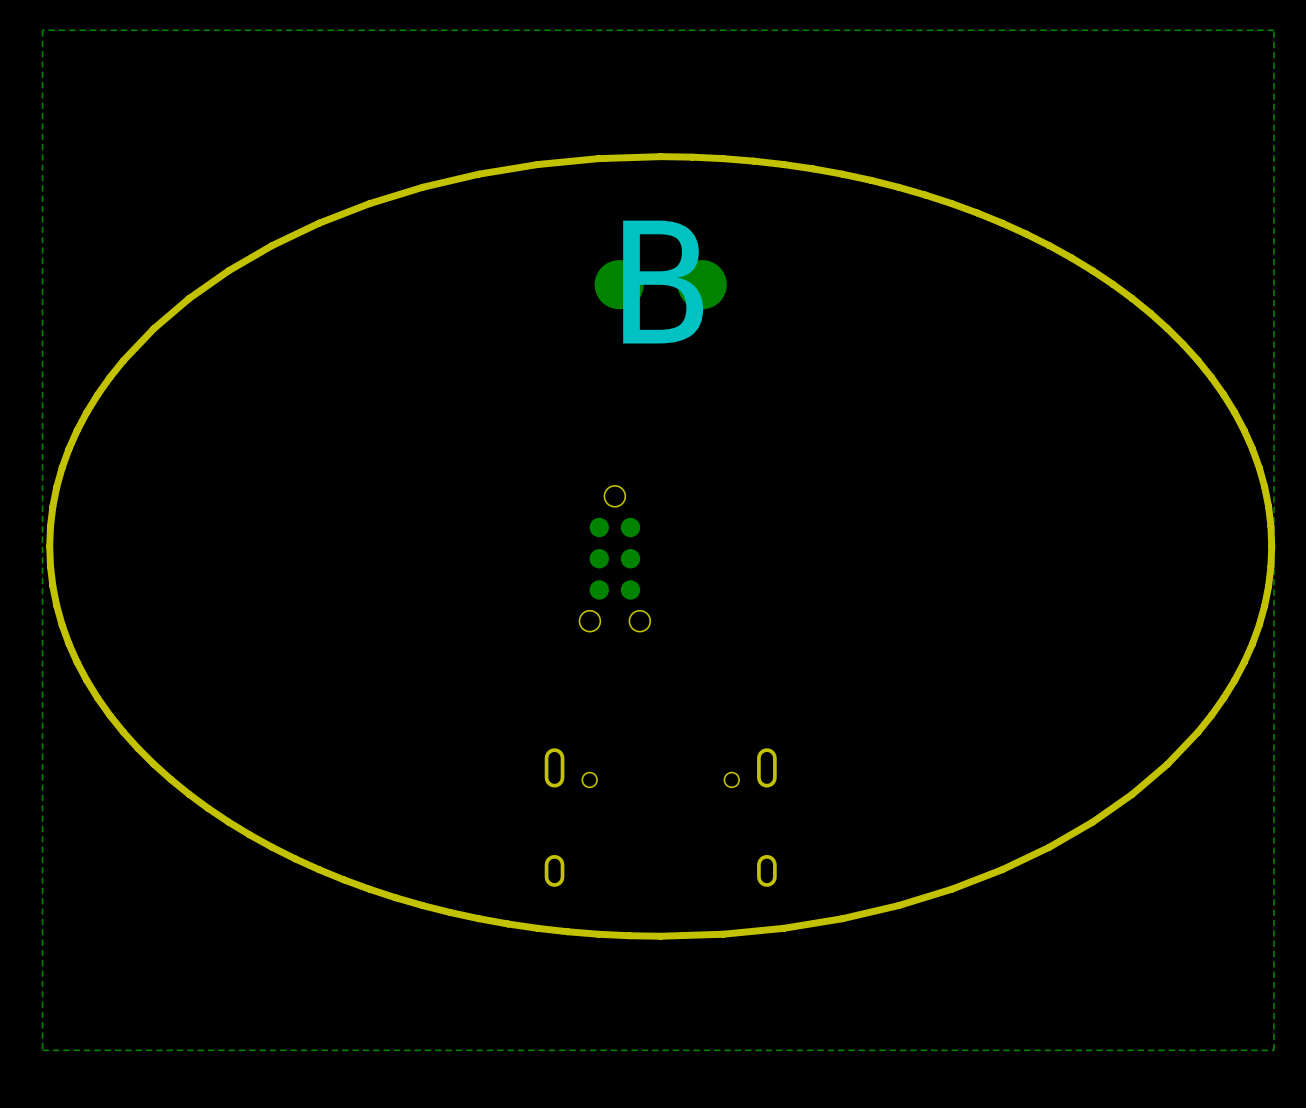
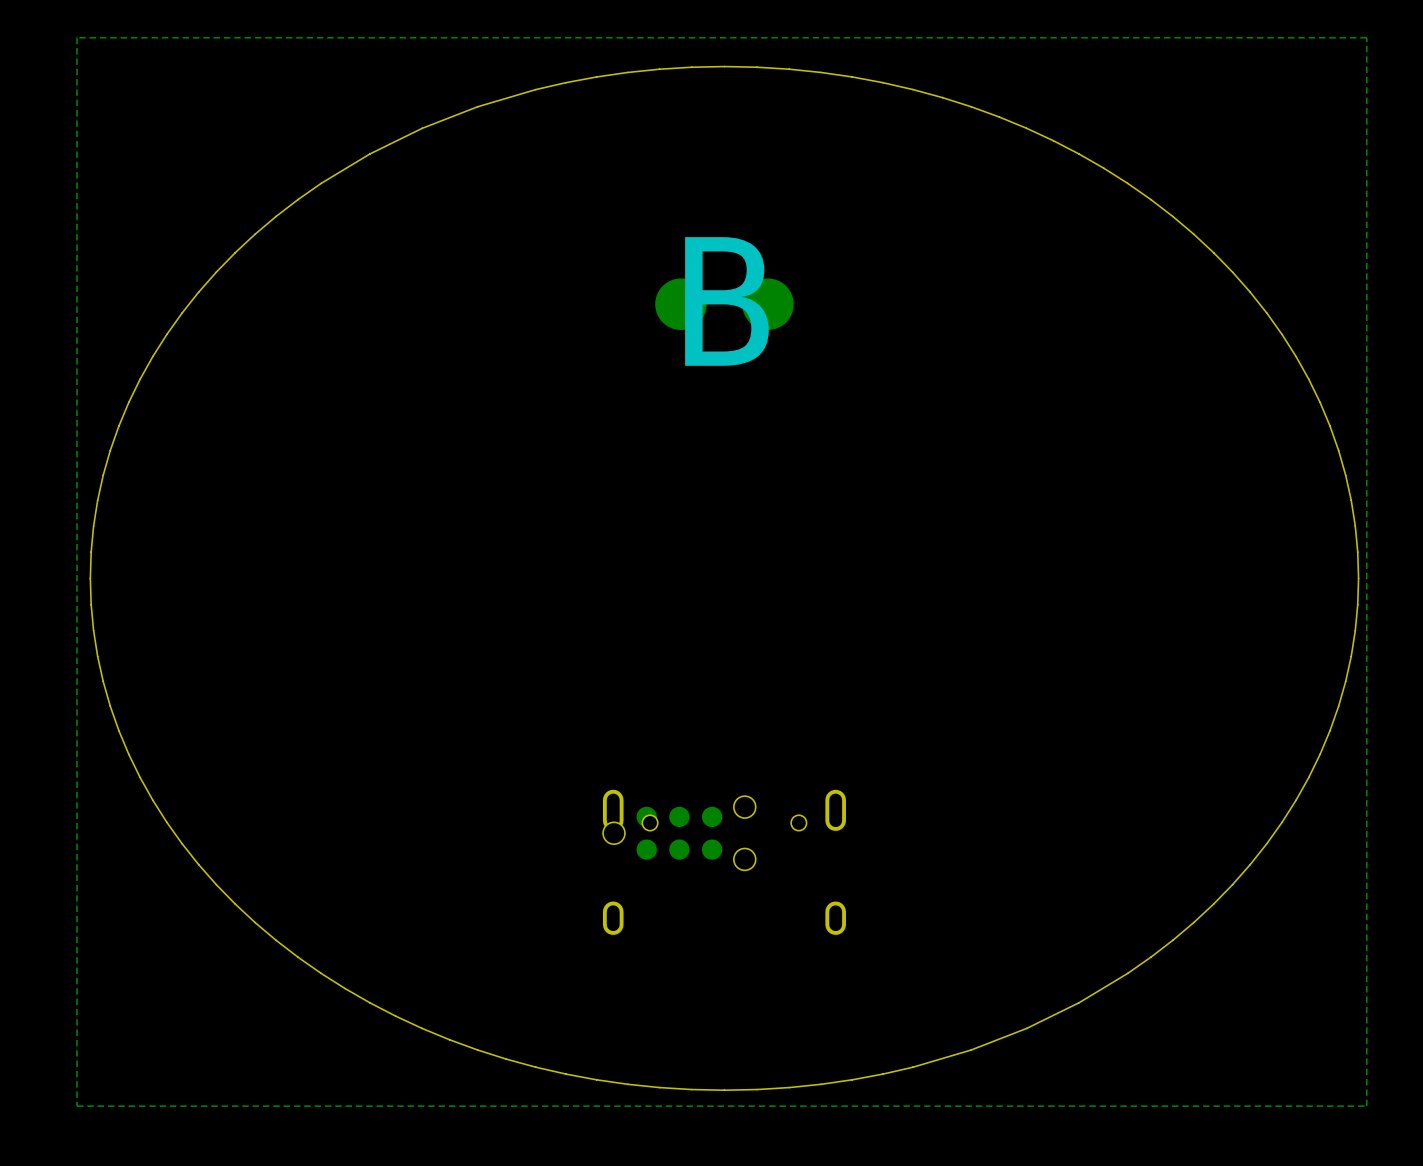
board edge: (660, 156) (723, 158) (813, 168) (870, 180) (951, 203) (1002, 223) (1071, 257) (1132, 298) (1167, 328) (1211, 377) (1234, 412) (1259, 467) (1268, 506) (1271, 546) (1270, 566) (1264, 605) (1252, 643) (1223, 698) (1197, 732) (1167, 764) (1132, 794) (1092, 822) (1049, 847) (1002, 869) (951, 889) (898, 905) (842, 918) (783, 928) (723, 934) (629, 935) (567, 931) (479, 918) (422, 905) (343, 879) (272, 847) (208, 808) (154, 764) (109, 715) (77, 662) (56, 605) (50, 566) (49, 546) (52, 506) (56, 487) (68, 449) (97, 394) (123, 360) (154, 328) (189, 298) (228, 270) (272, 245) (319, 223) (369, 203) (422, 187) (479, 174) (537, 164) (598, 158) (660, 156) -> (724, 66) (789, 69) (852, 76) (913, 89) (971, 106) (1026, 128) (1078, 153) (1127, 183) (1172, 216) (1213, 252) (1250, 292) (1282, 334) (1308, 379) (1330, 426) (1345, 475) (1355, 526) (1358, 578) (1355, 630) (1345, 681) (1330, 730) (1308, 777) (1282, 822) (1250, 864) (1213, 903) (1172, 940) (1127, 973) (1078, 1002) (1026, 1028) (971, 1049) (913, 1067) (852, 1079) (789, 1087) (724, 1090) (659, 1087) (596, 1079) (535, 1067) (477, 1049) (422, 1028) (369, 1002) (321, 973) (276, 940) (235, 903) (198, 864) (166, 822) (140, 777) (118, 730) (103, 681) (93, 630) (90, 578) (93, 526) (103, 475) (118, 426) (140, 379) (166, 334) (198, 292) (235, 252) (276, 216) (321, 183) (369, 153) (422, 128) (477, 106) (535, 89) (596, 76) (659, 69) (724, 66)
part rotation: 0° (614, 558) -> 90° counterclockwise (679, 833)
part position: (614, 558) -> (679, 833)

